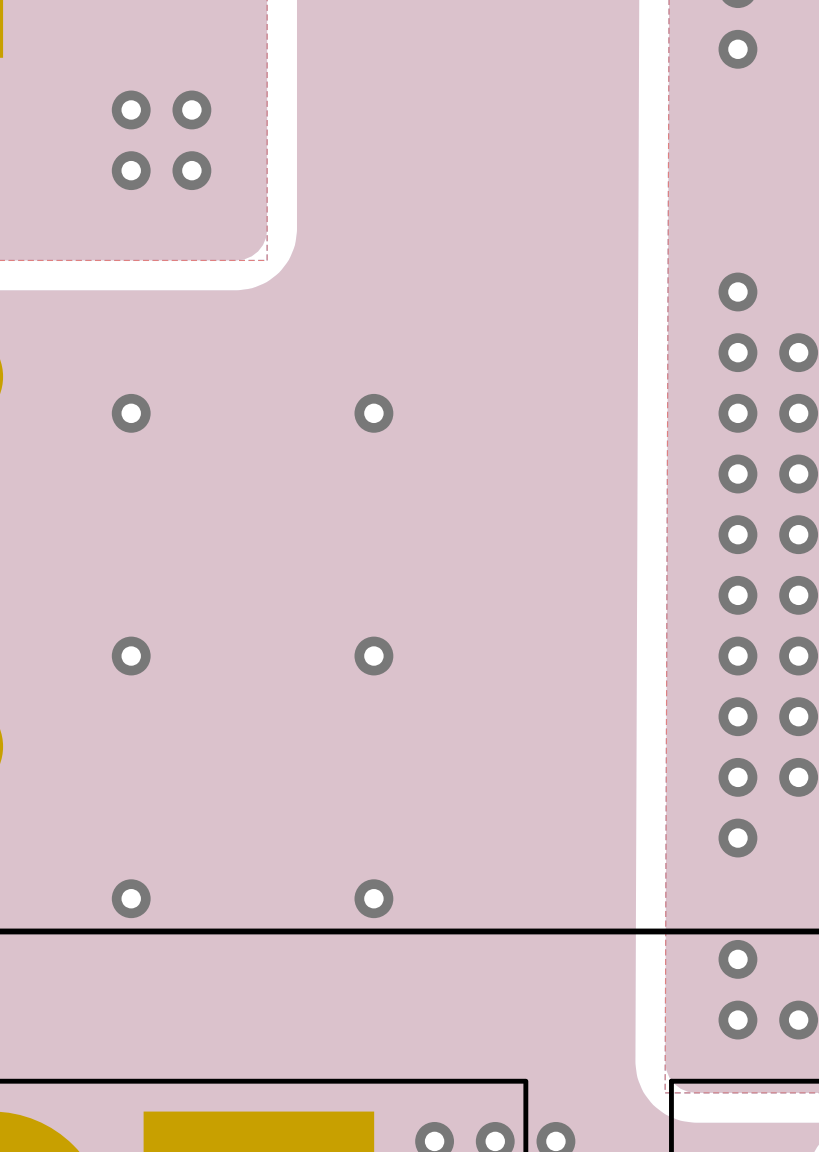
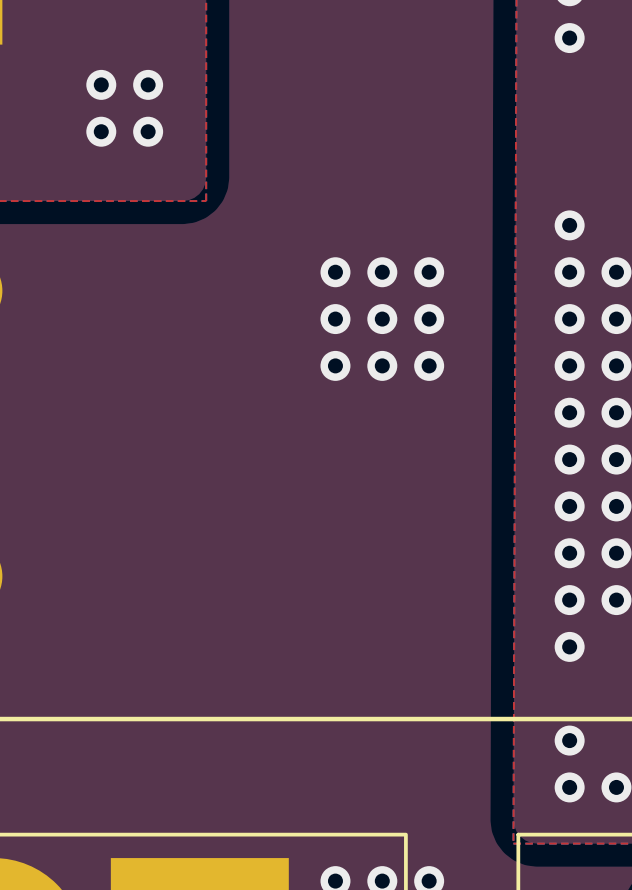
via: none -> (335, 272)
via: none -> (382, 272)
via: none -> (429, 272)
via: (131, 413) -> none
via: (373, 413) -> none
via: none -> (335, 319)
via: none -> (382, 319)
via: none -> (429, 319)
via: none -> (335, 365)
via: none -> (382, 365)
via: none -> (429, 365)
via: (131, 656) -> none
via: (373, 656) -> none
via: (131, 898) -> none
via: (373, 898) -> none

